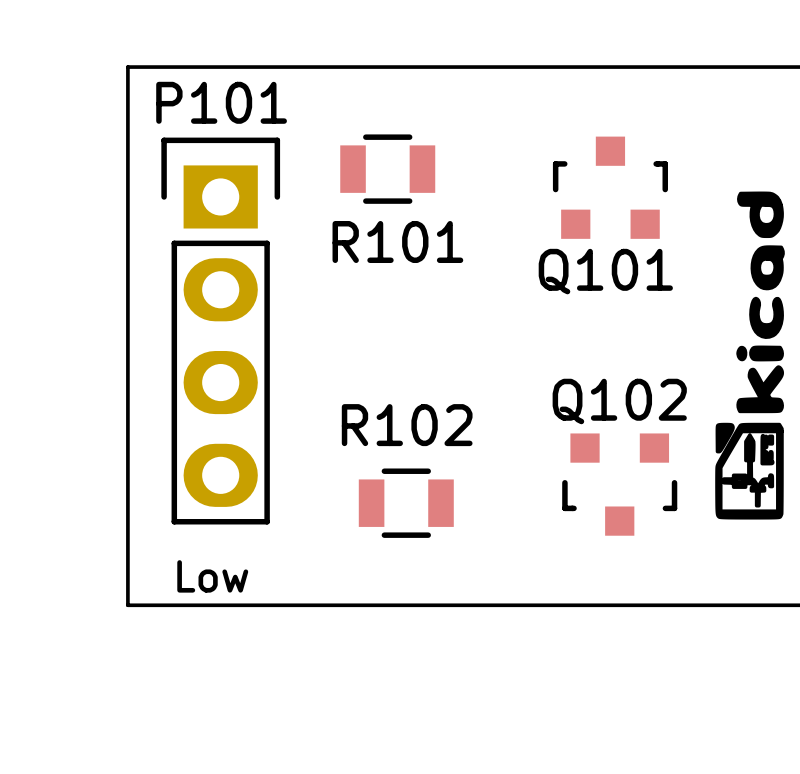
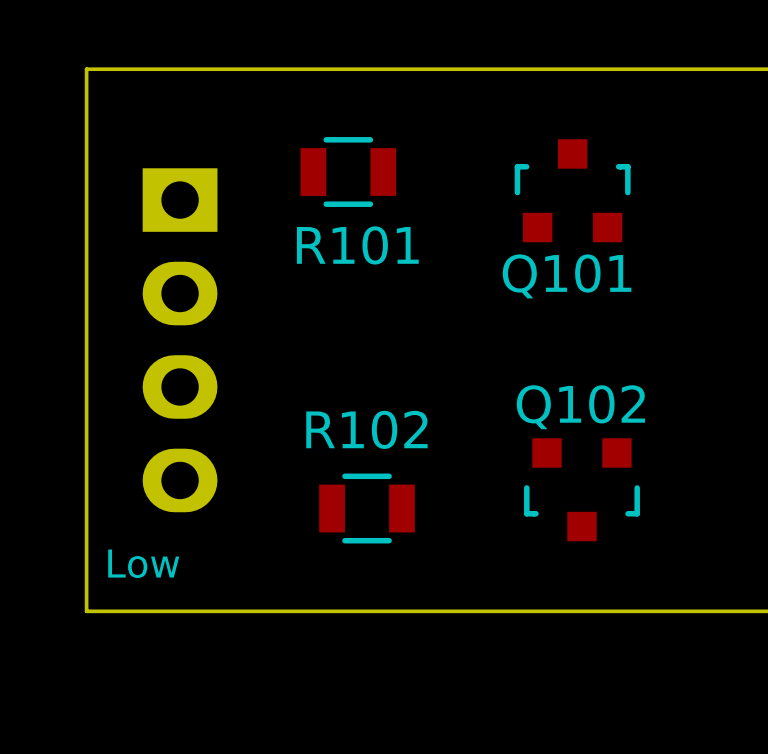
drawing: [715, 191, 785, 520] -> none
P101 side: top (220, 331) -> bottom (180, 340)
text position: Low (212, 576) -> Low (143, 563)

